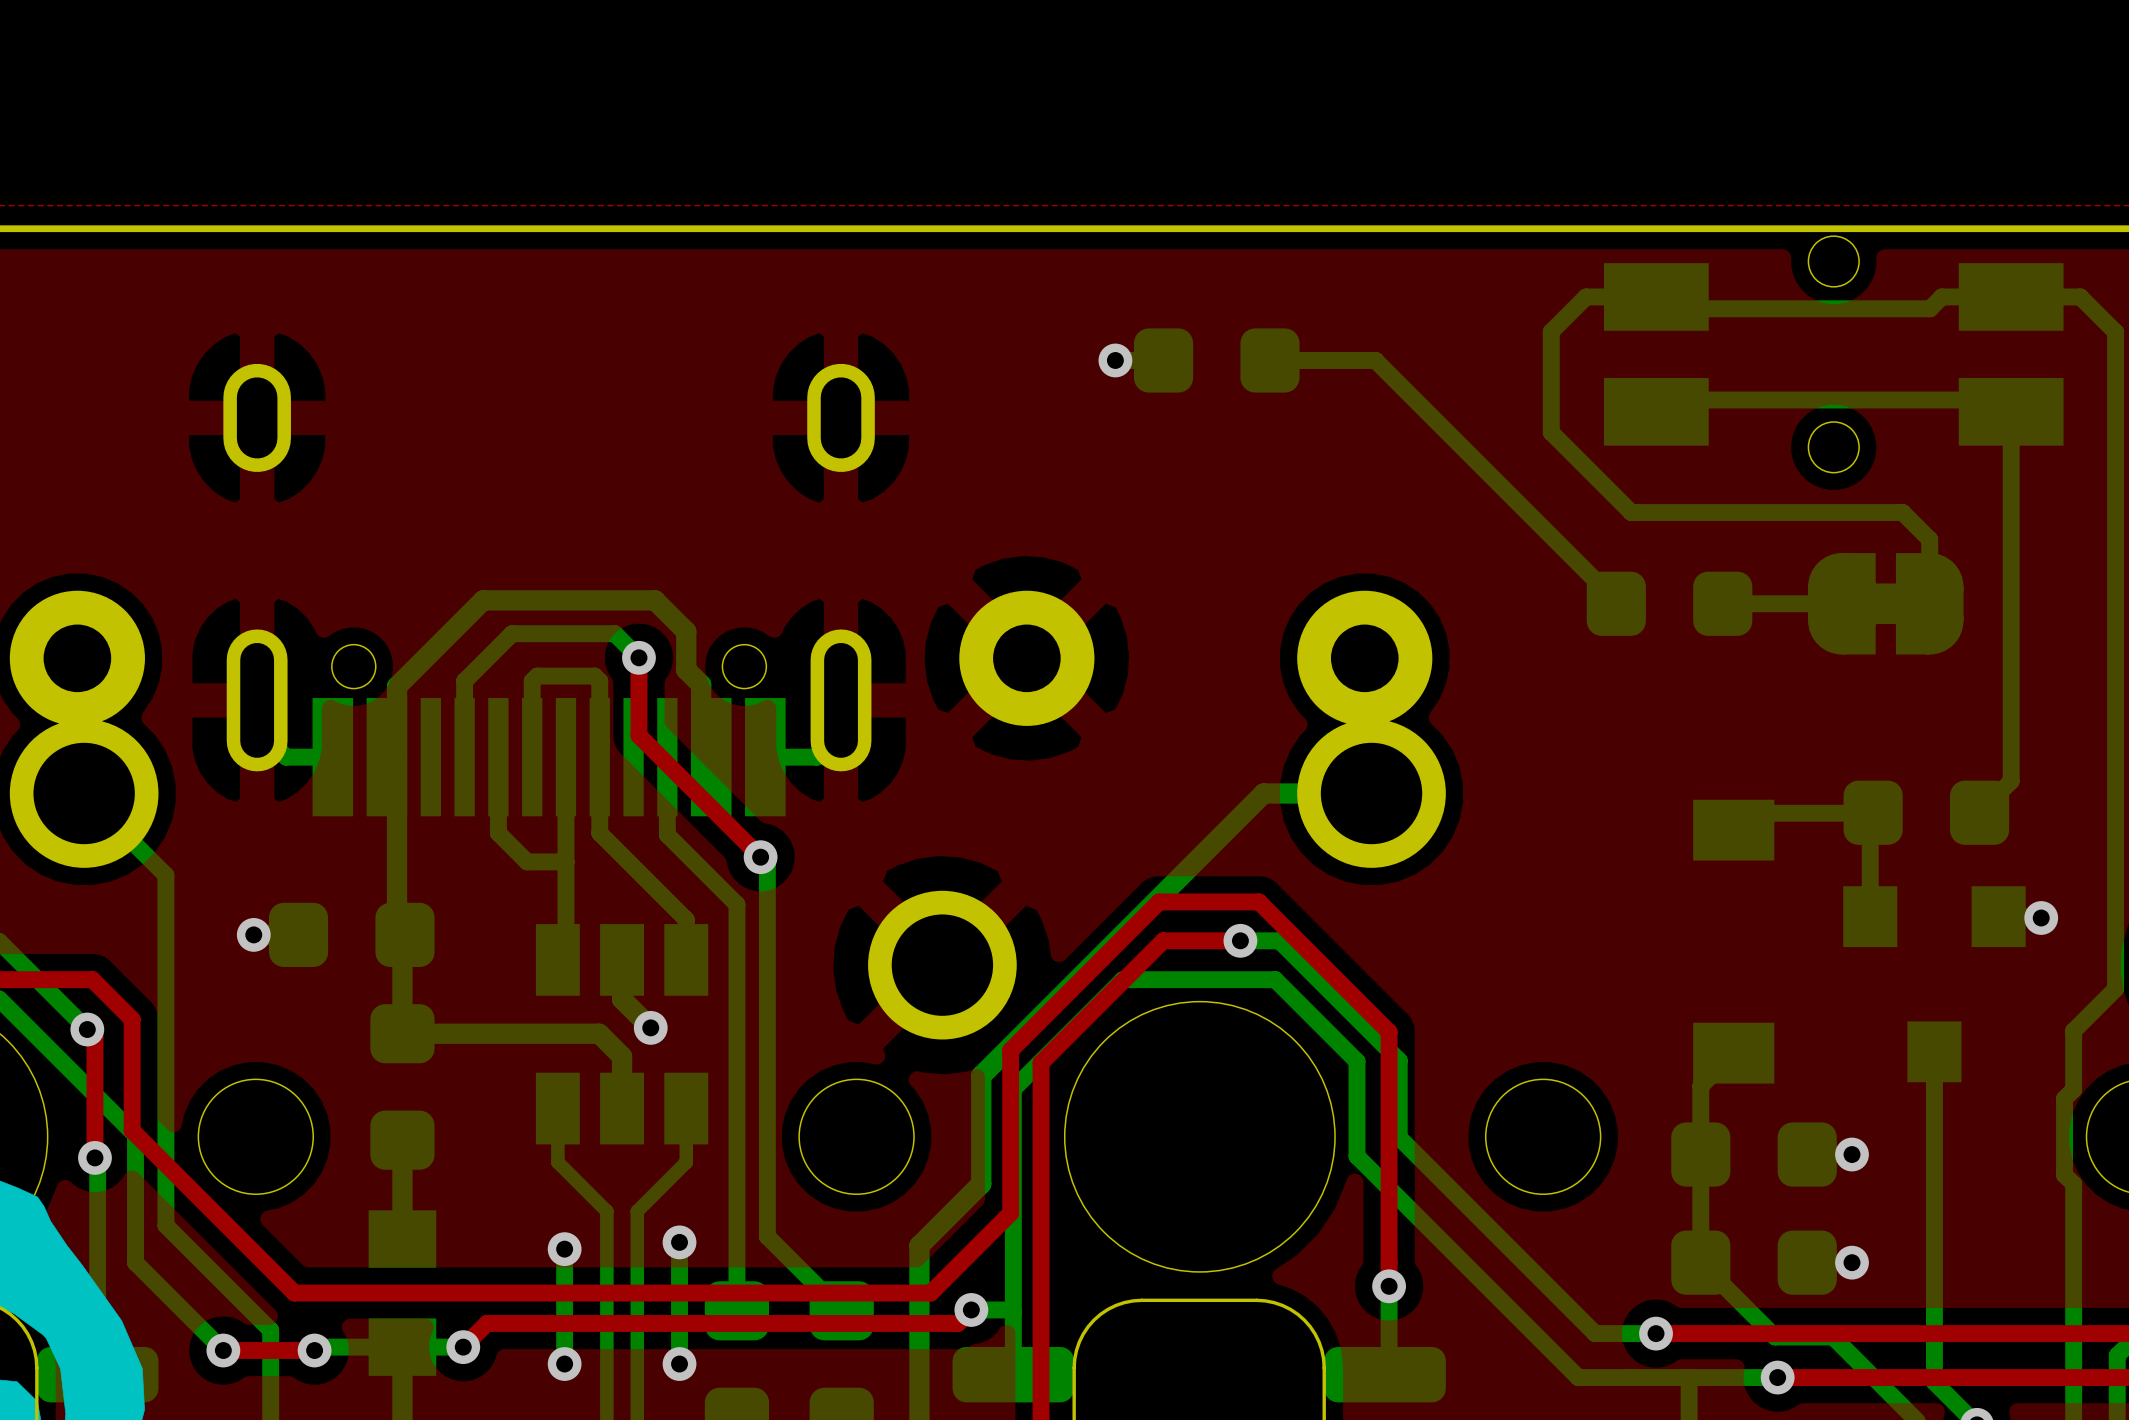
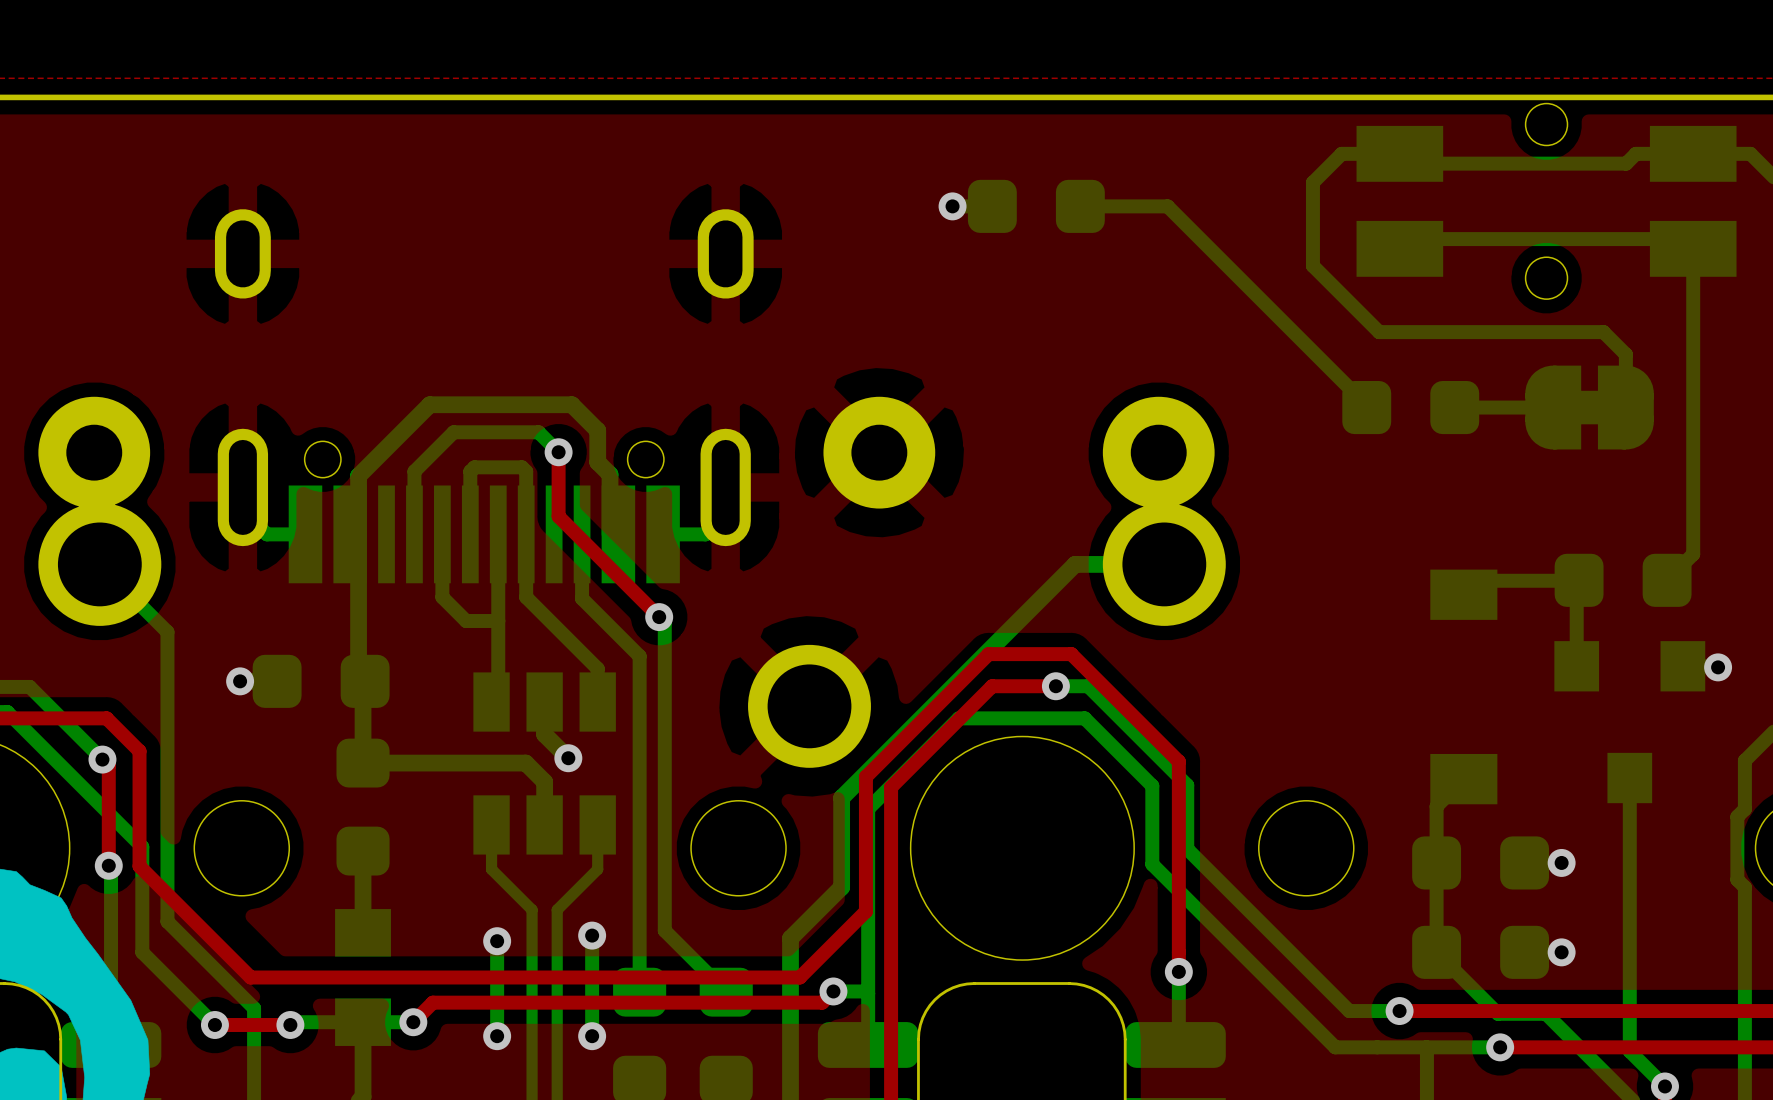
top track: (132, 1130) (294, 1293) -> (139, 843) (139, 866) (250, 977) (273, 977)

